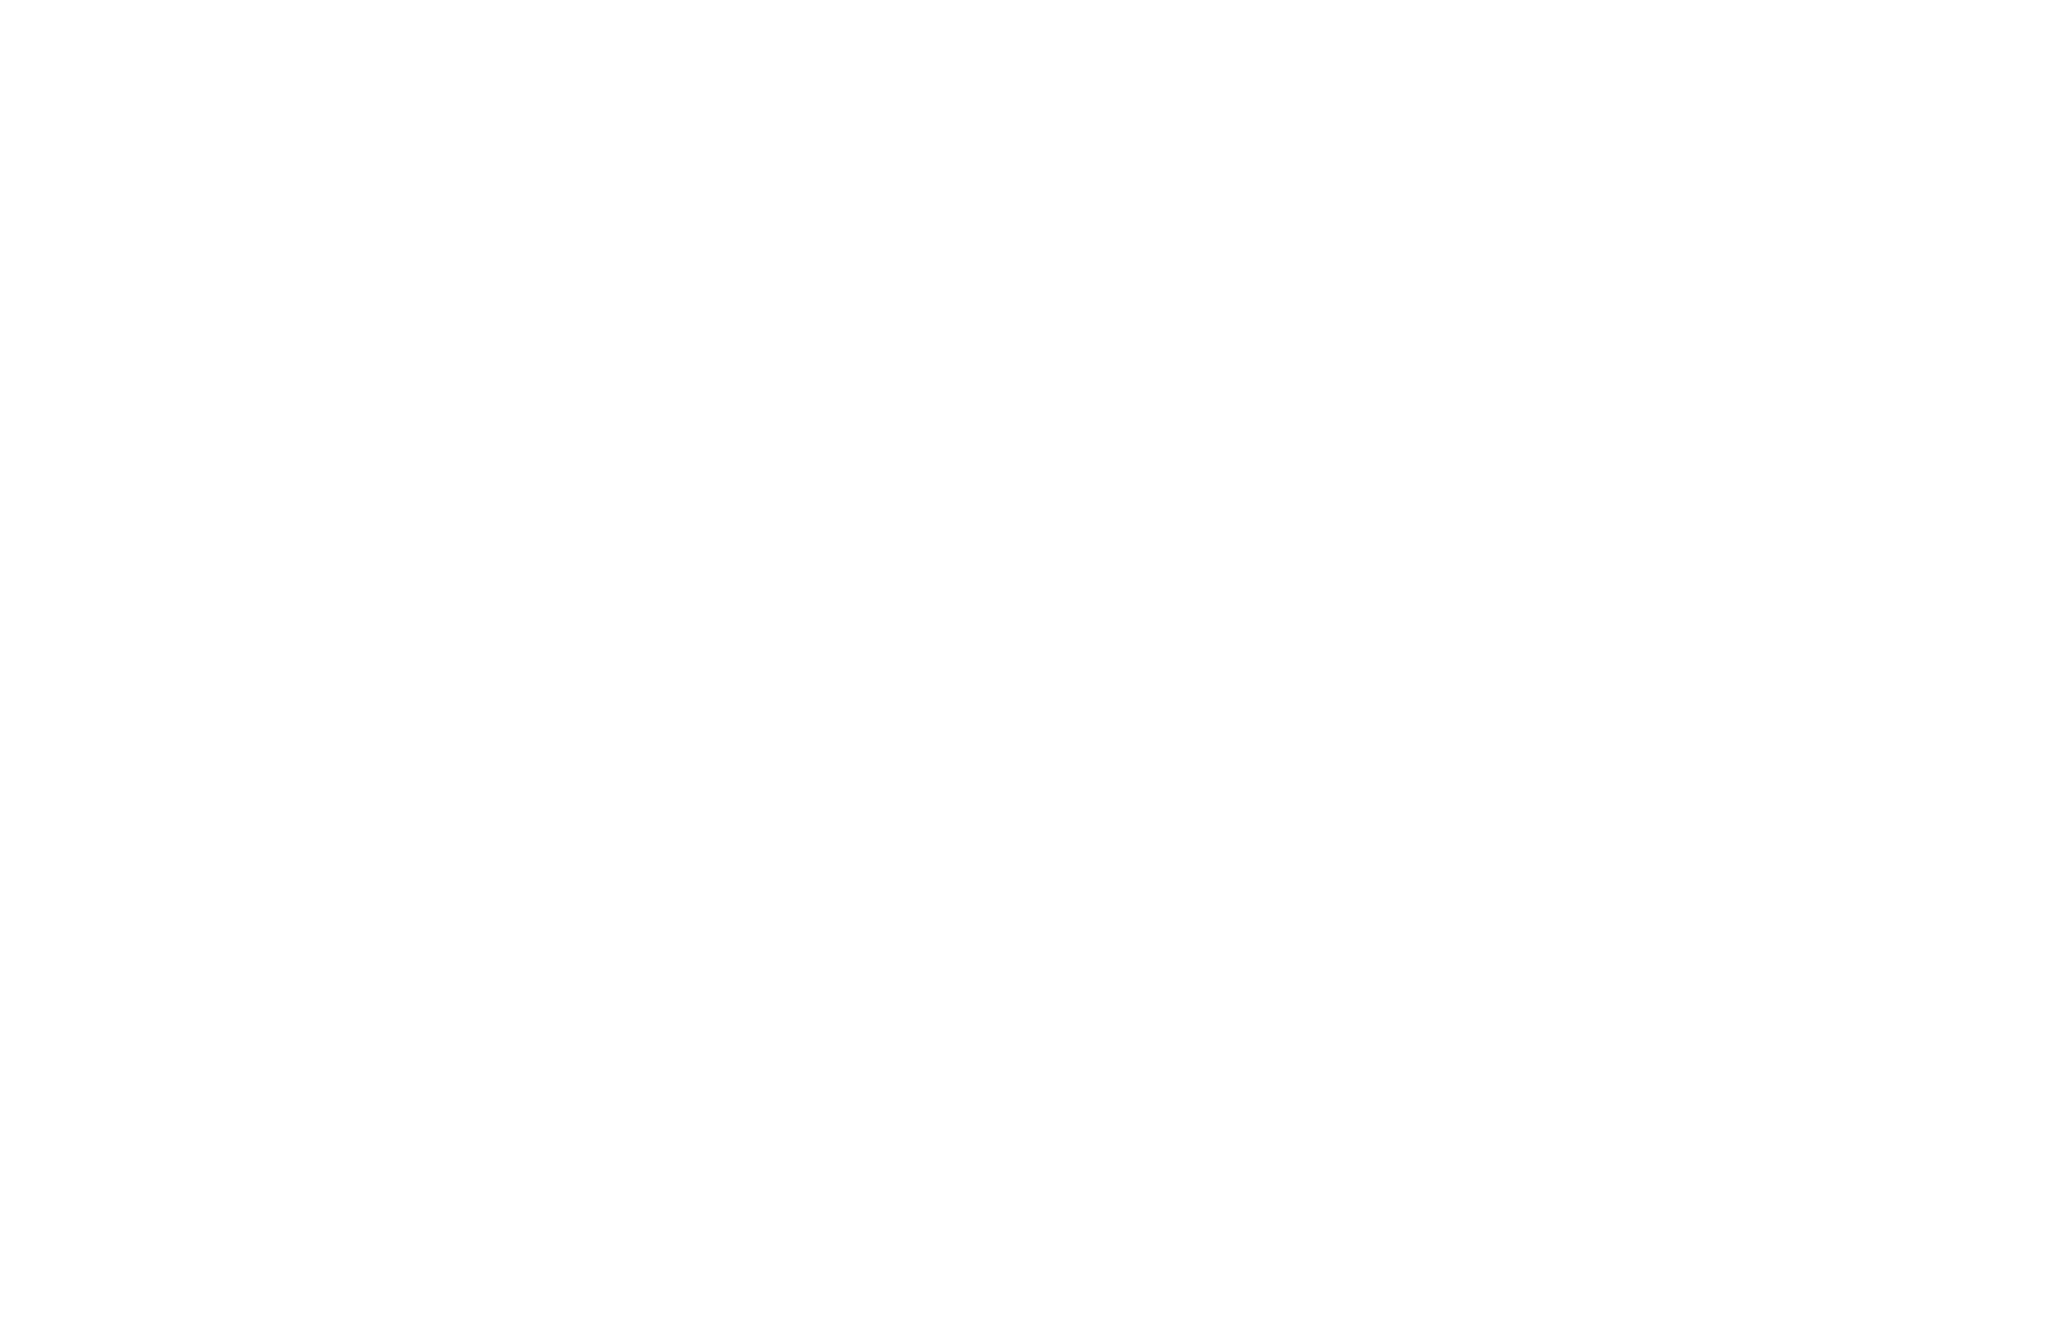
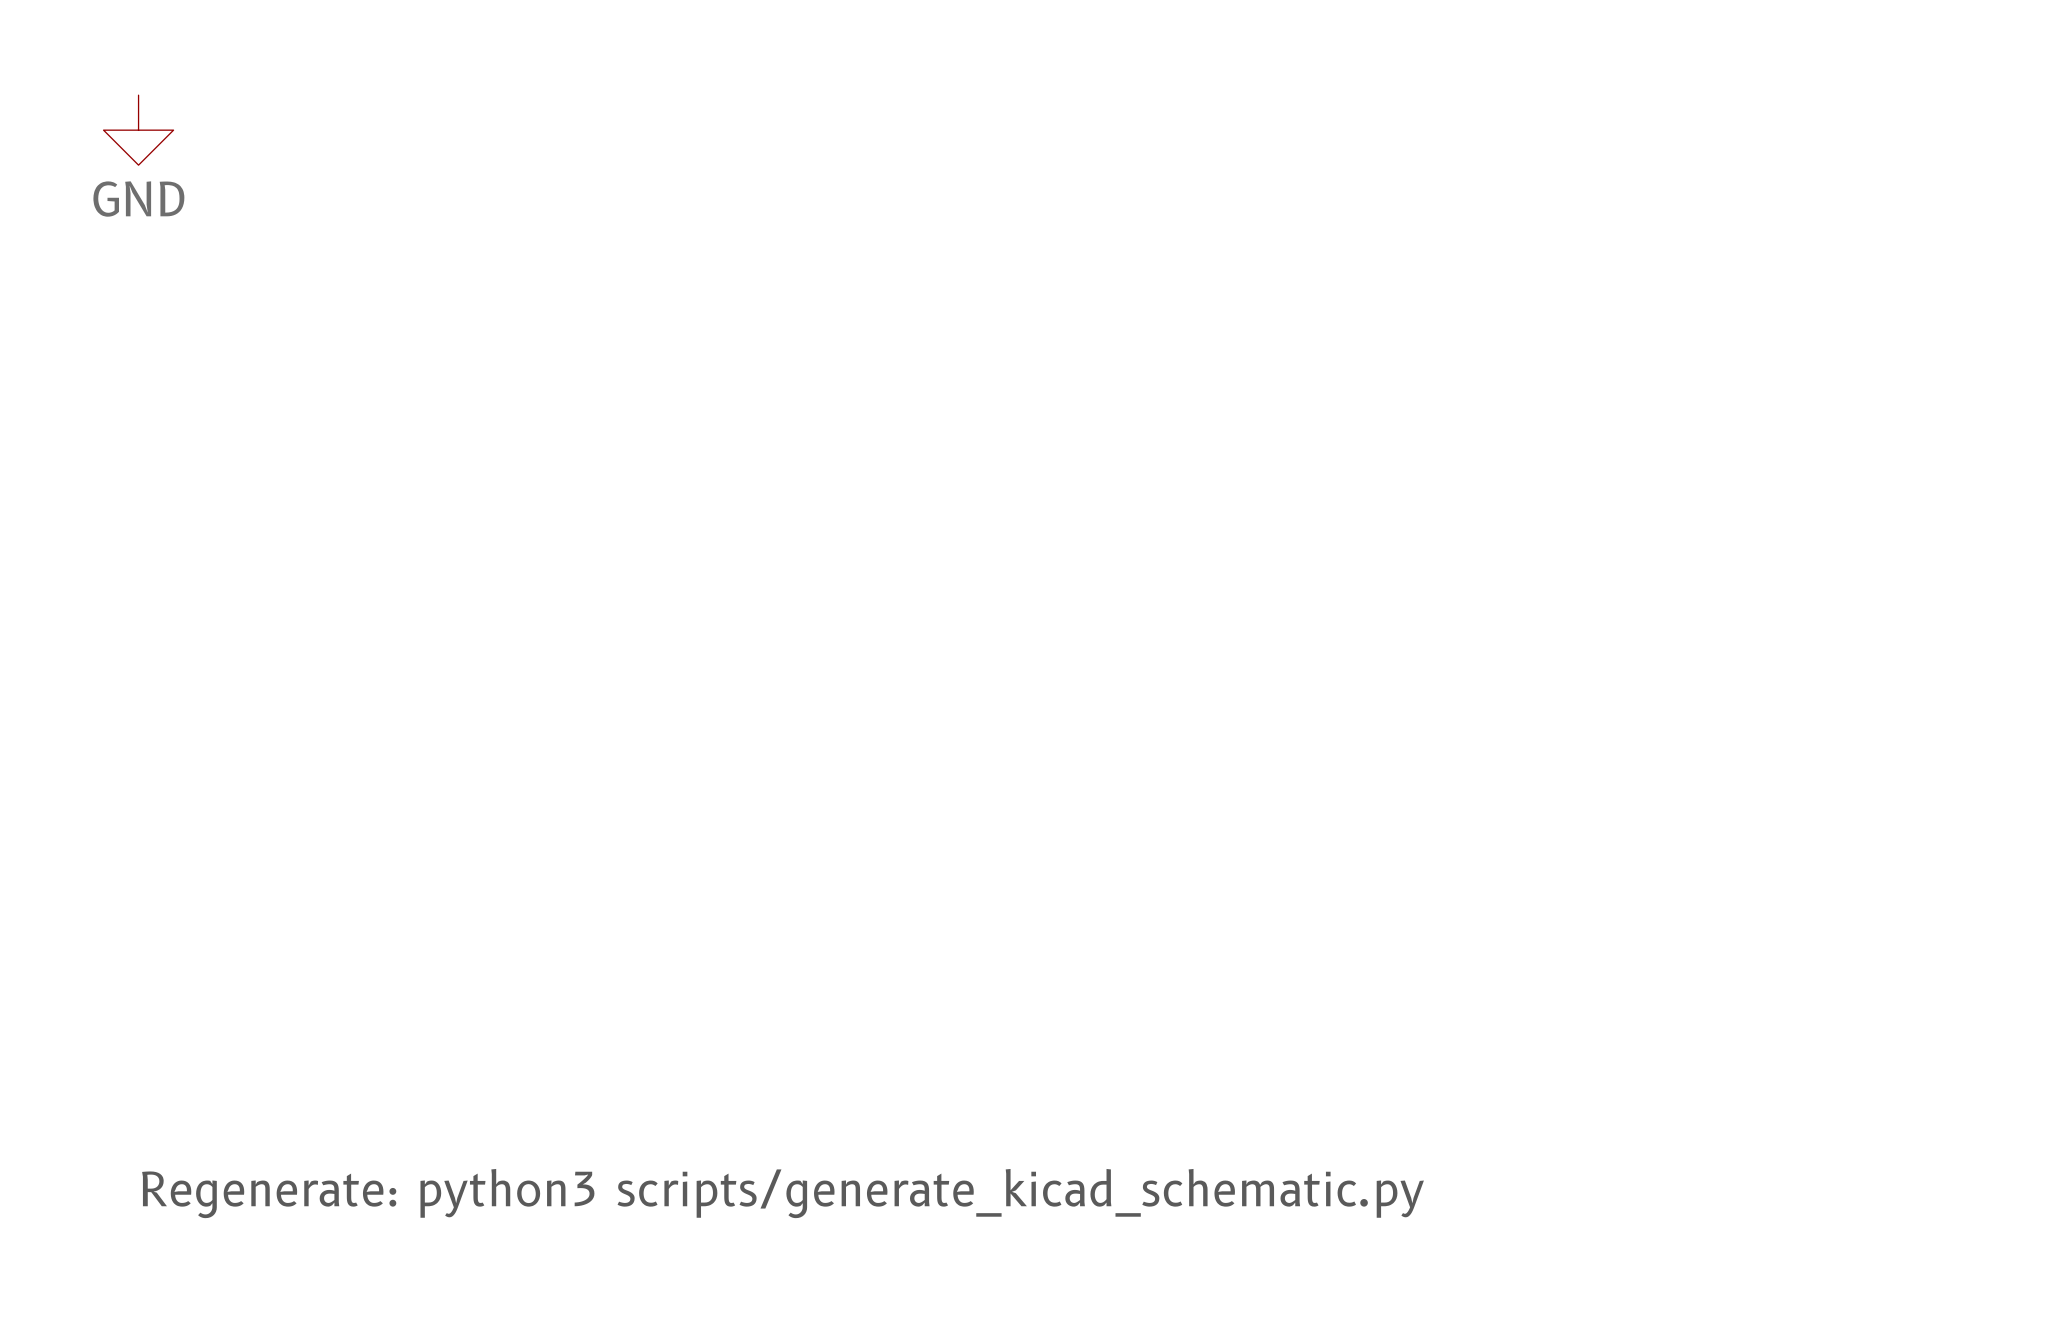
power symbol: none -> GND (138, 130)
text: none -> Regenerate: python3 scripts/generate_kicad_schematic.py (783, 1193)

